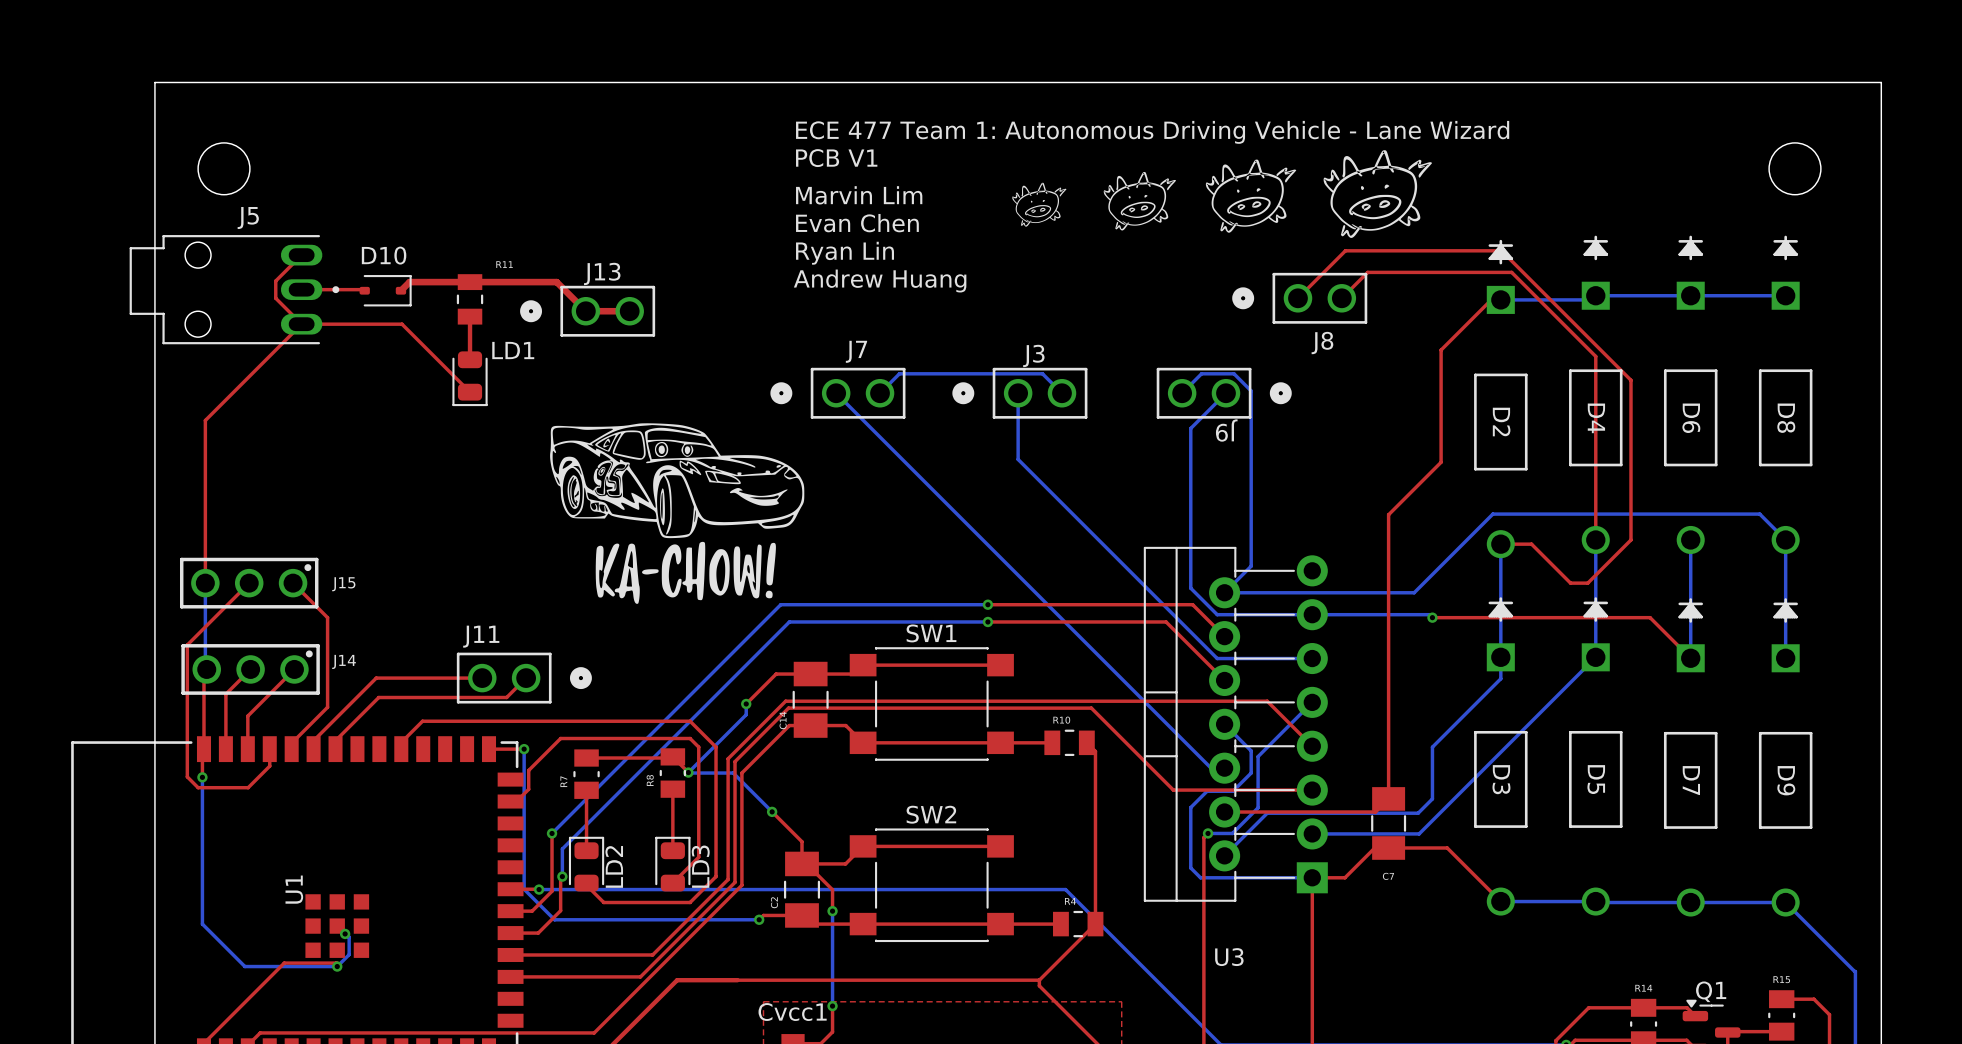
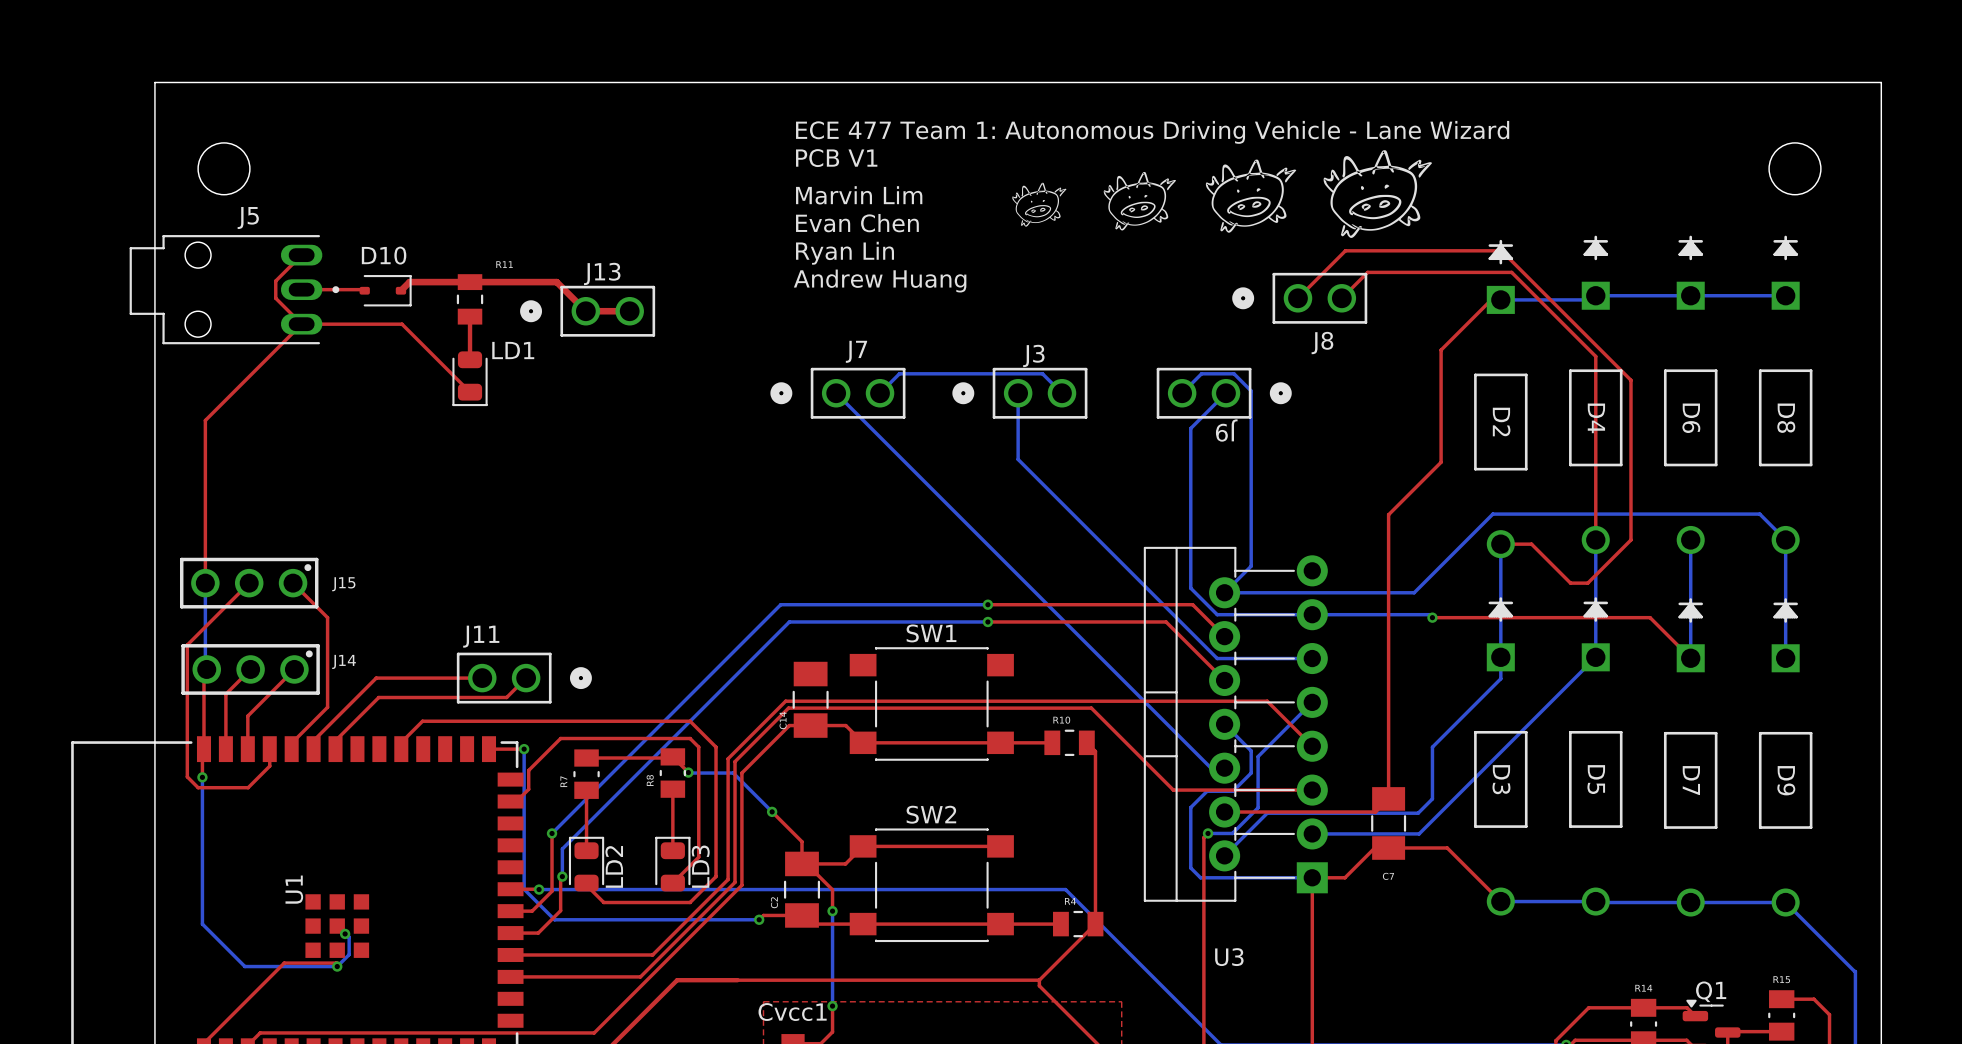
drawing: [550, 423, 805, 604] -> none
top track: (1000, 665) (863, 665) (854, 674) (776, 674) (746, 703) -> none
bottom track: (746, 703) (746, 714) (688, 772) -> none
via: (746, 703) -> none

